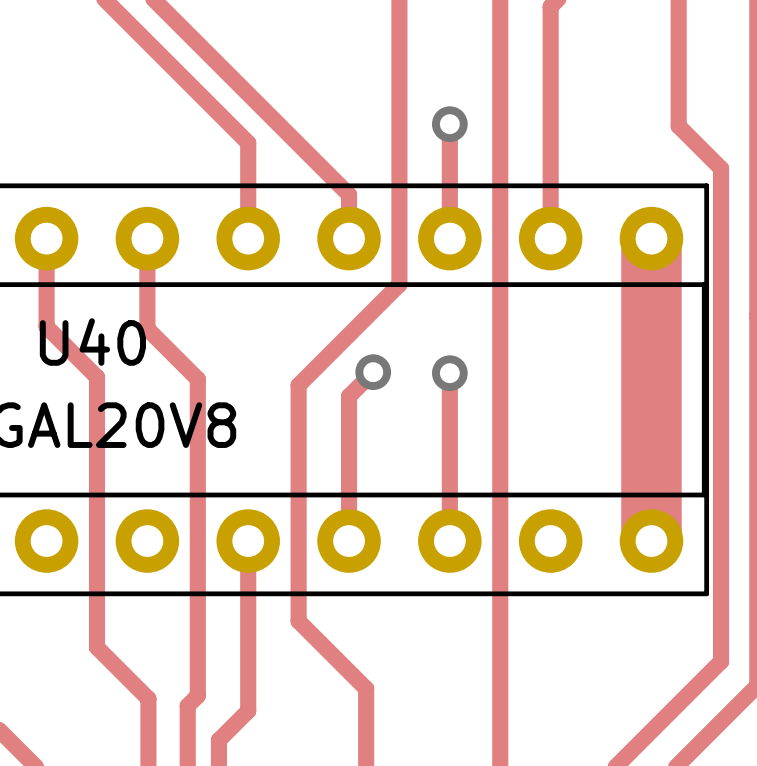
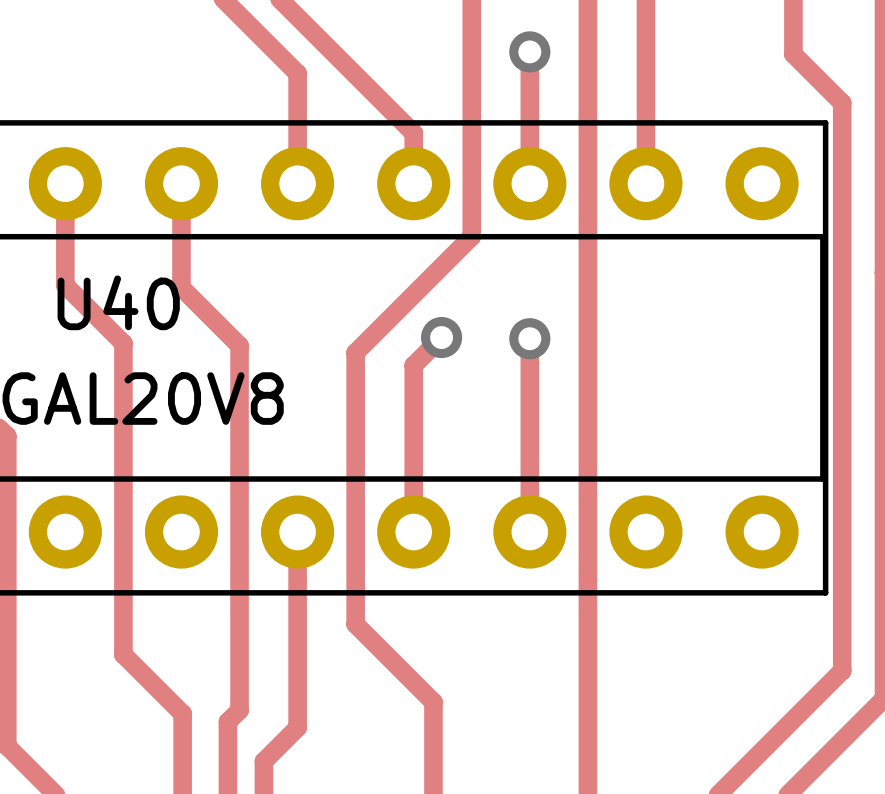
track: (651, 238) (651, 541) -> none

